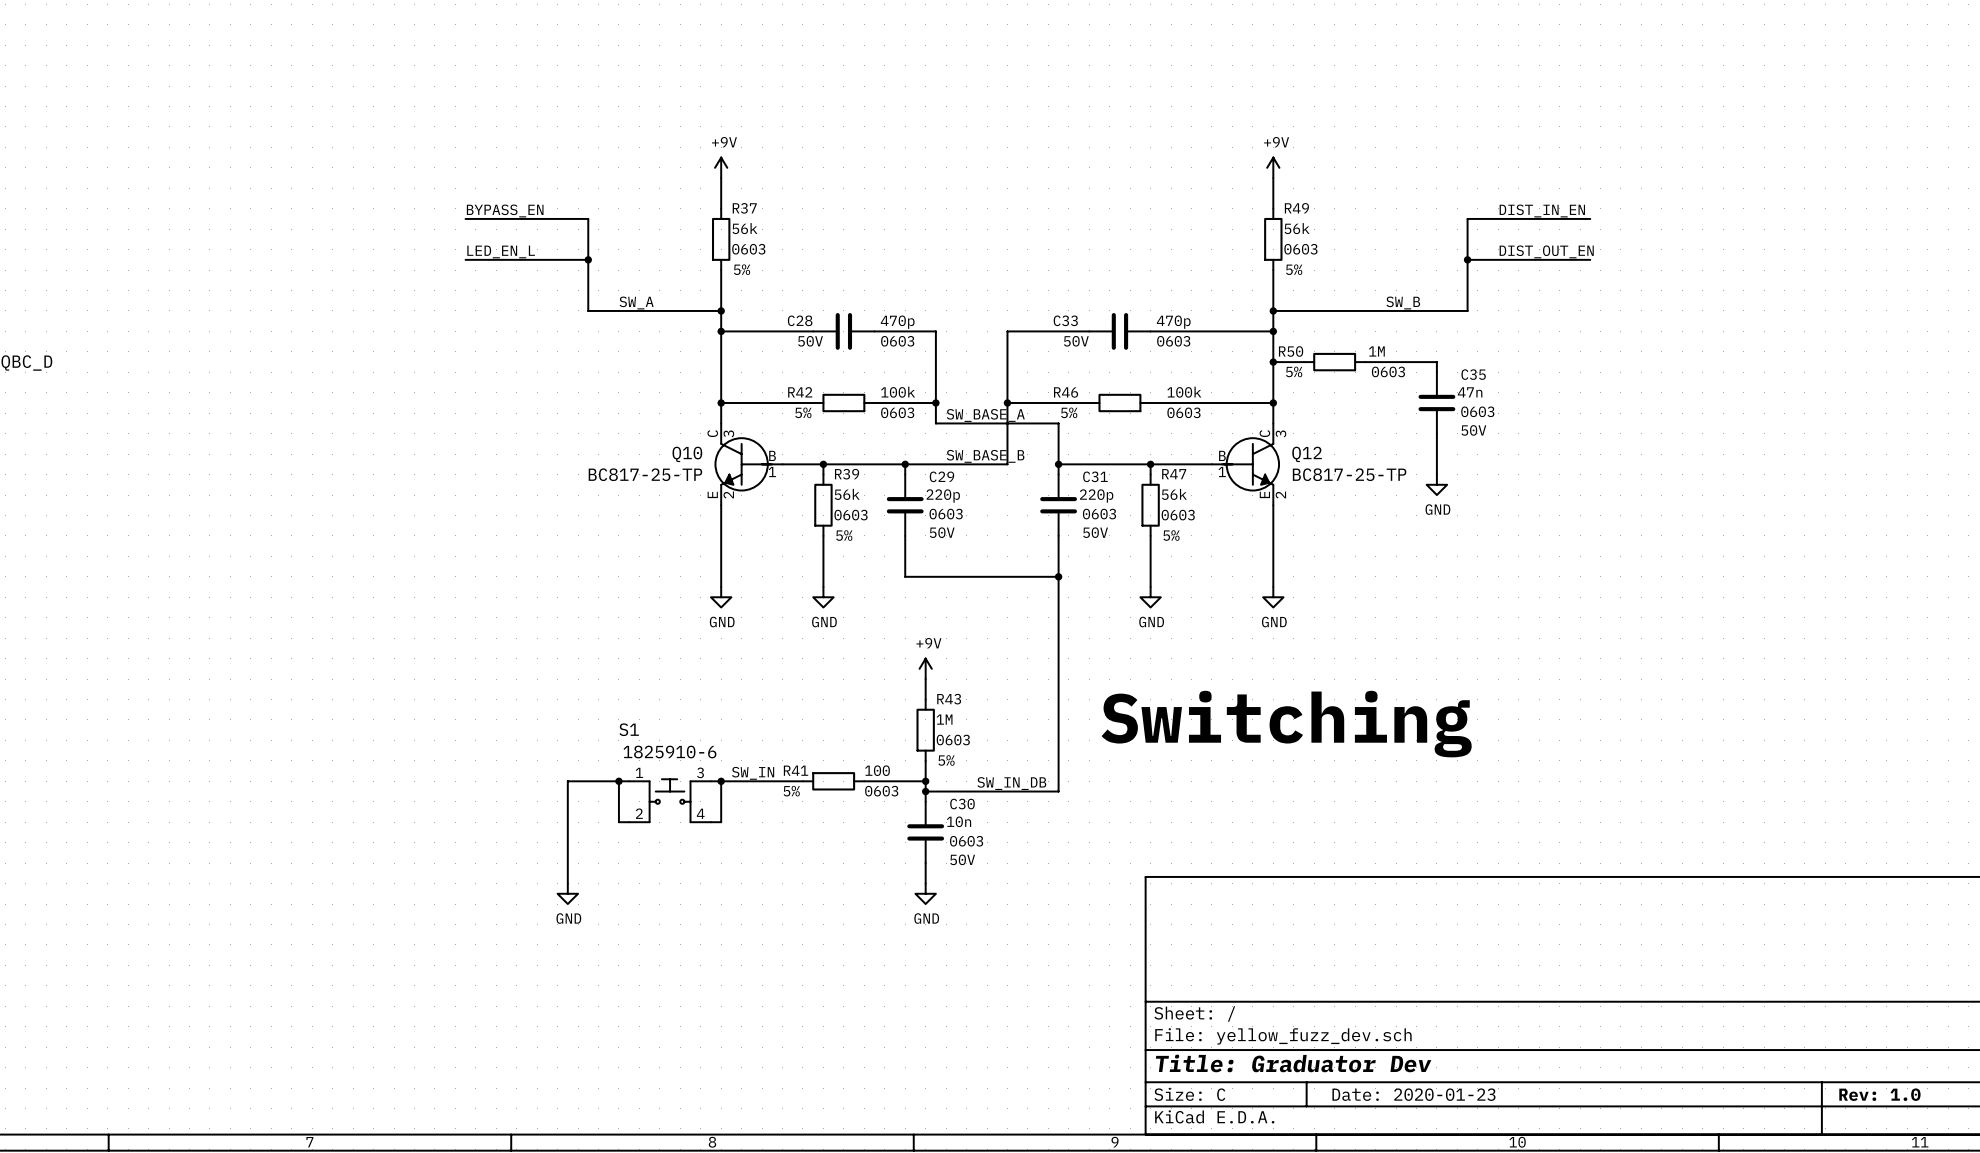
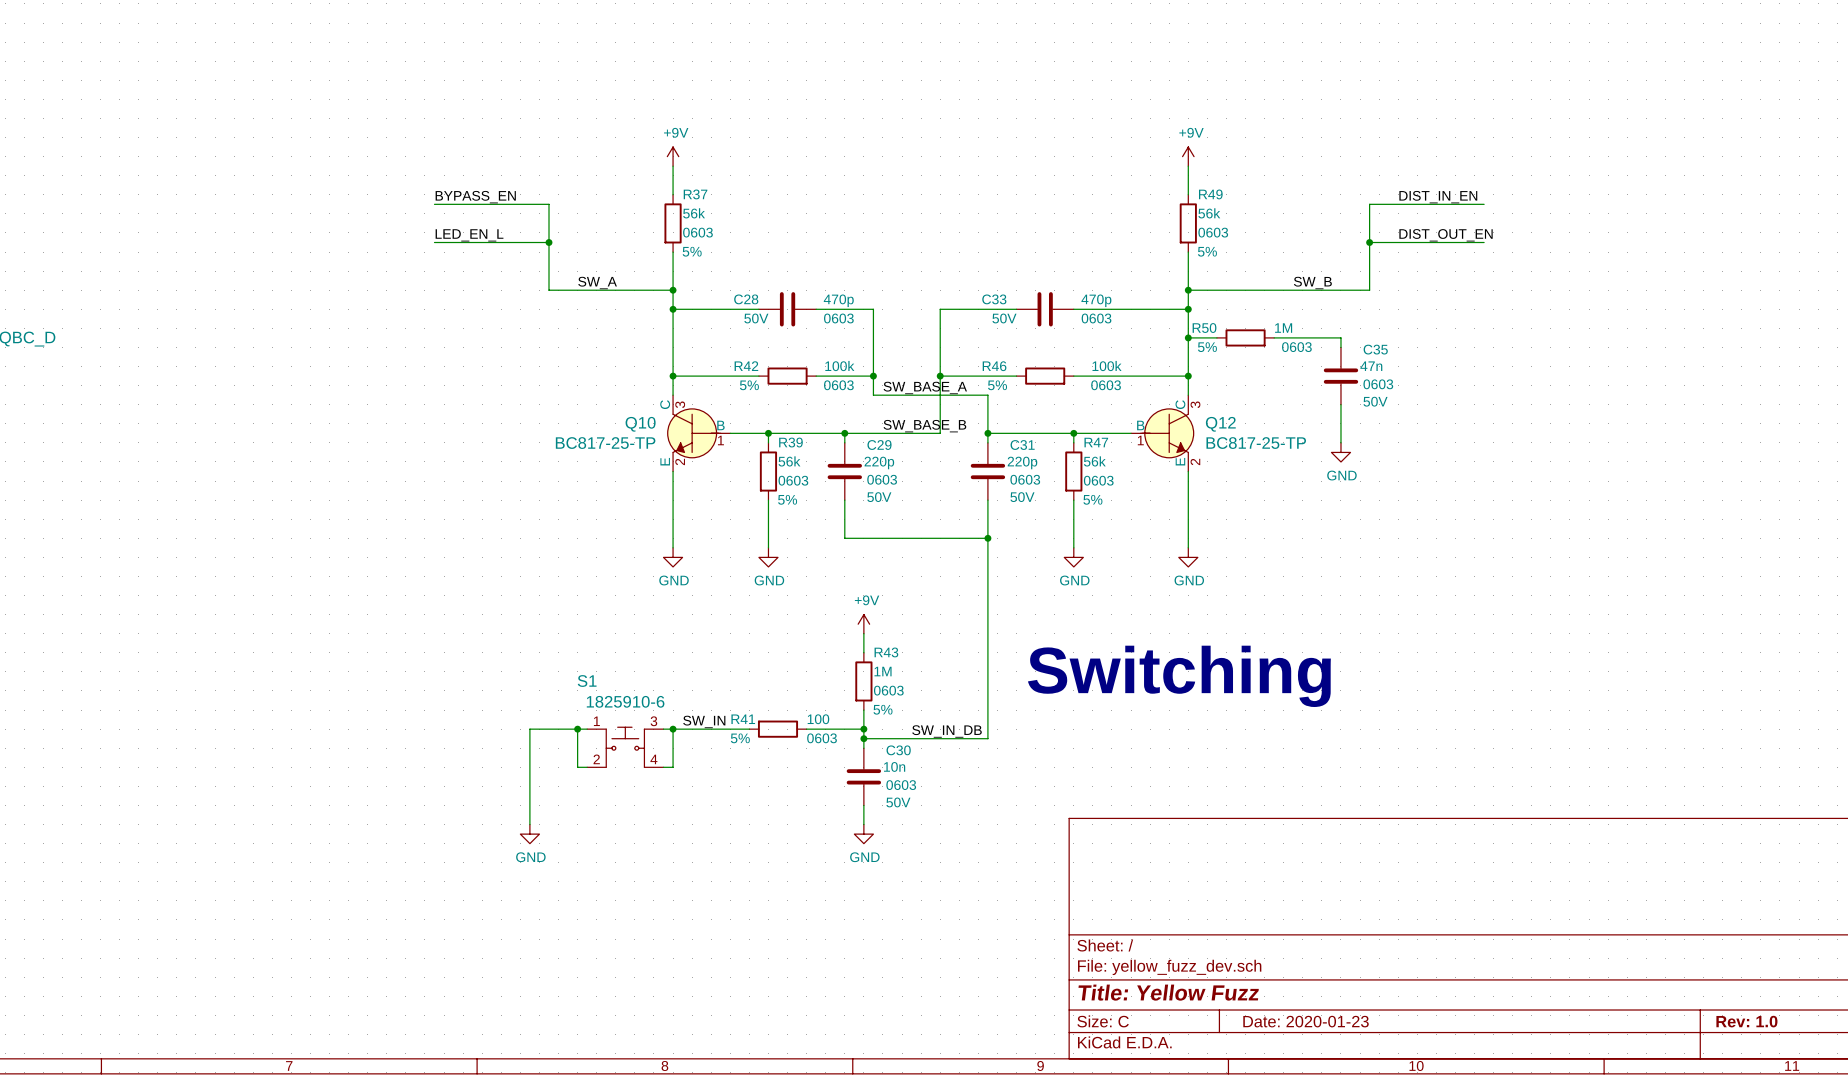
title block: Title: Graduator Dev (1293, 1063) -> Title: Yellow Fuzz (1168, 992)

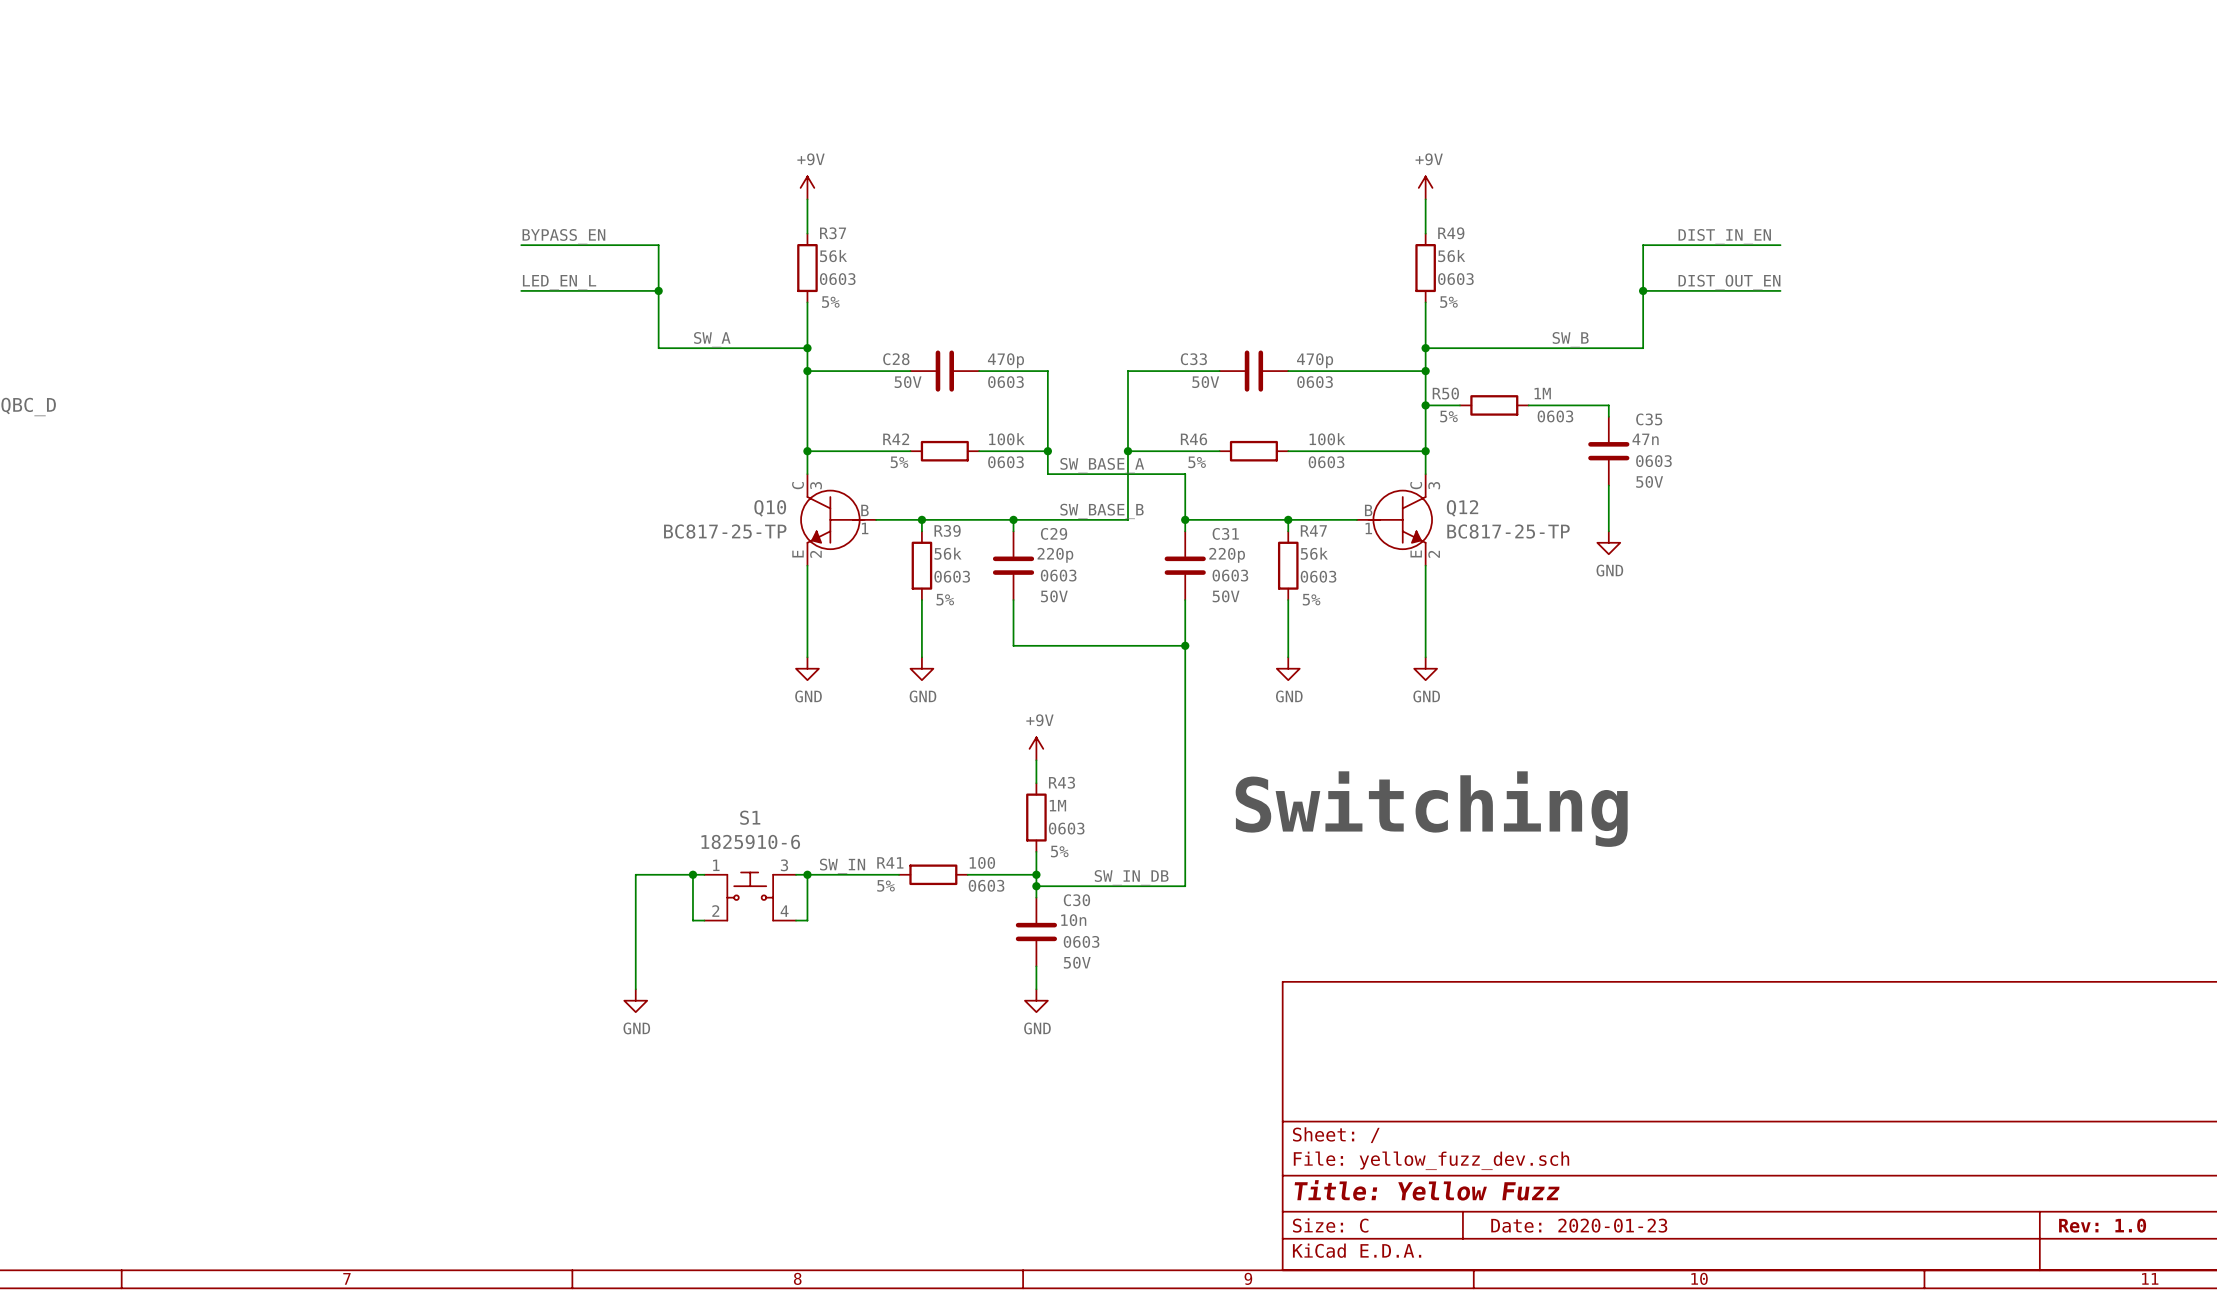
S1 name position: S1 (587, 681) -> S1 (750, 817)

